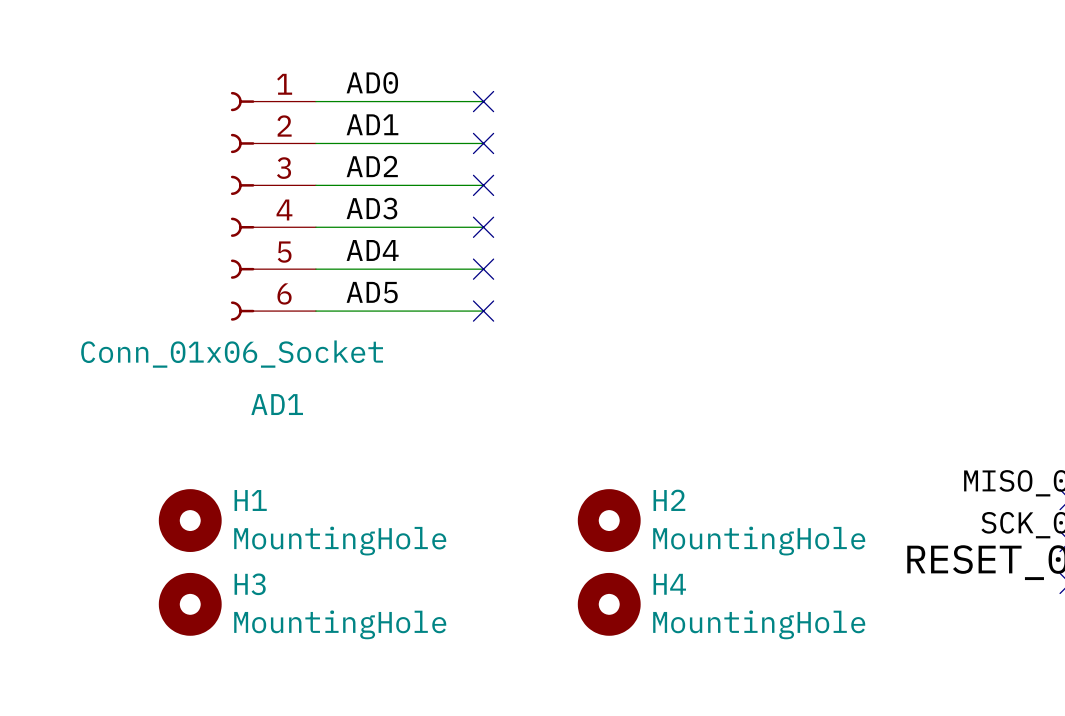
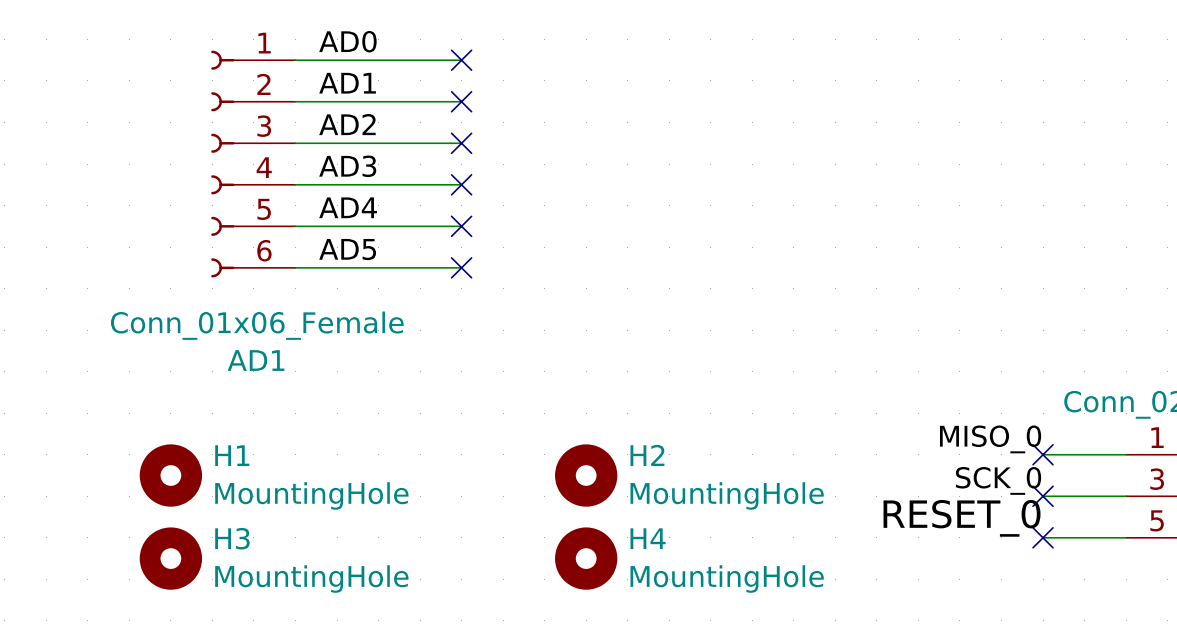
AD1 value: Conn_01x06_Socket (232, 354) -> Conn_01x06_Female (257, 325)

